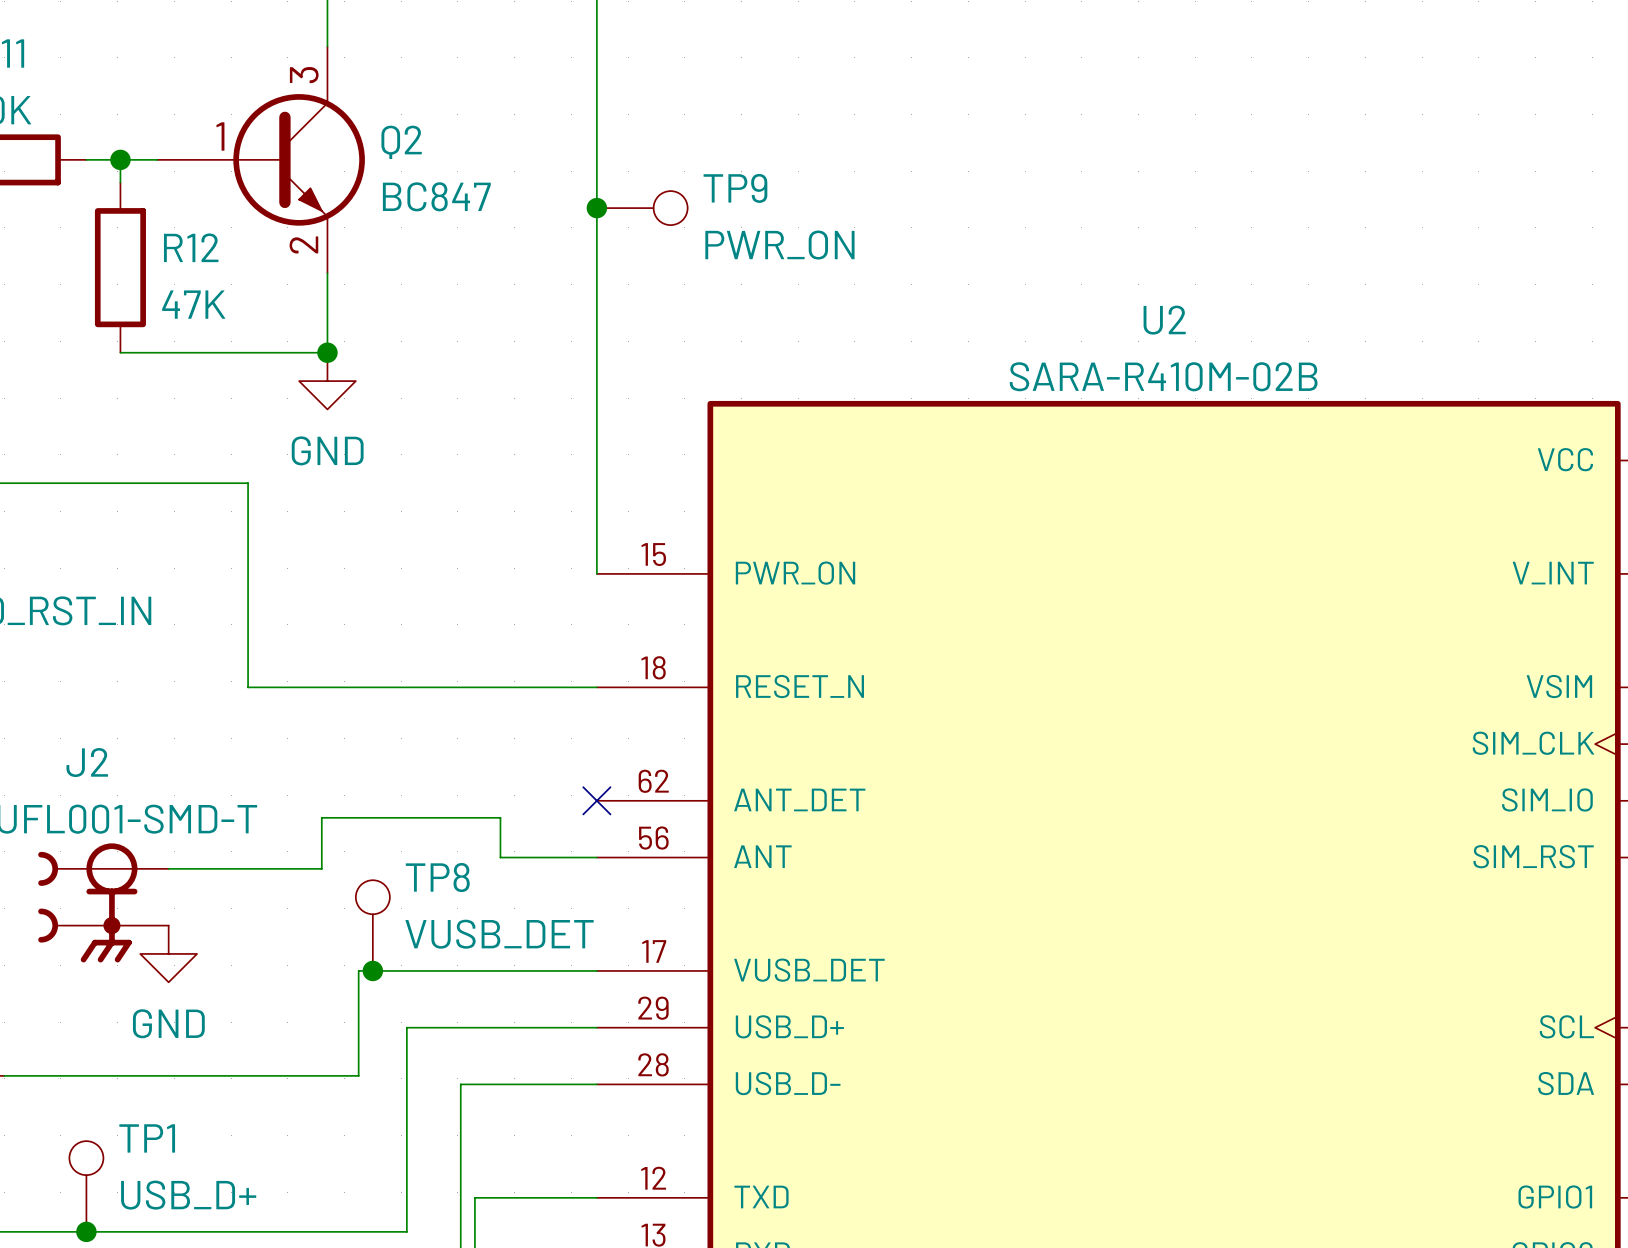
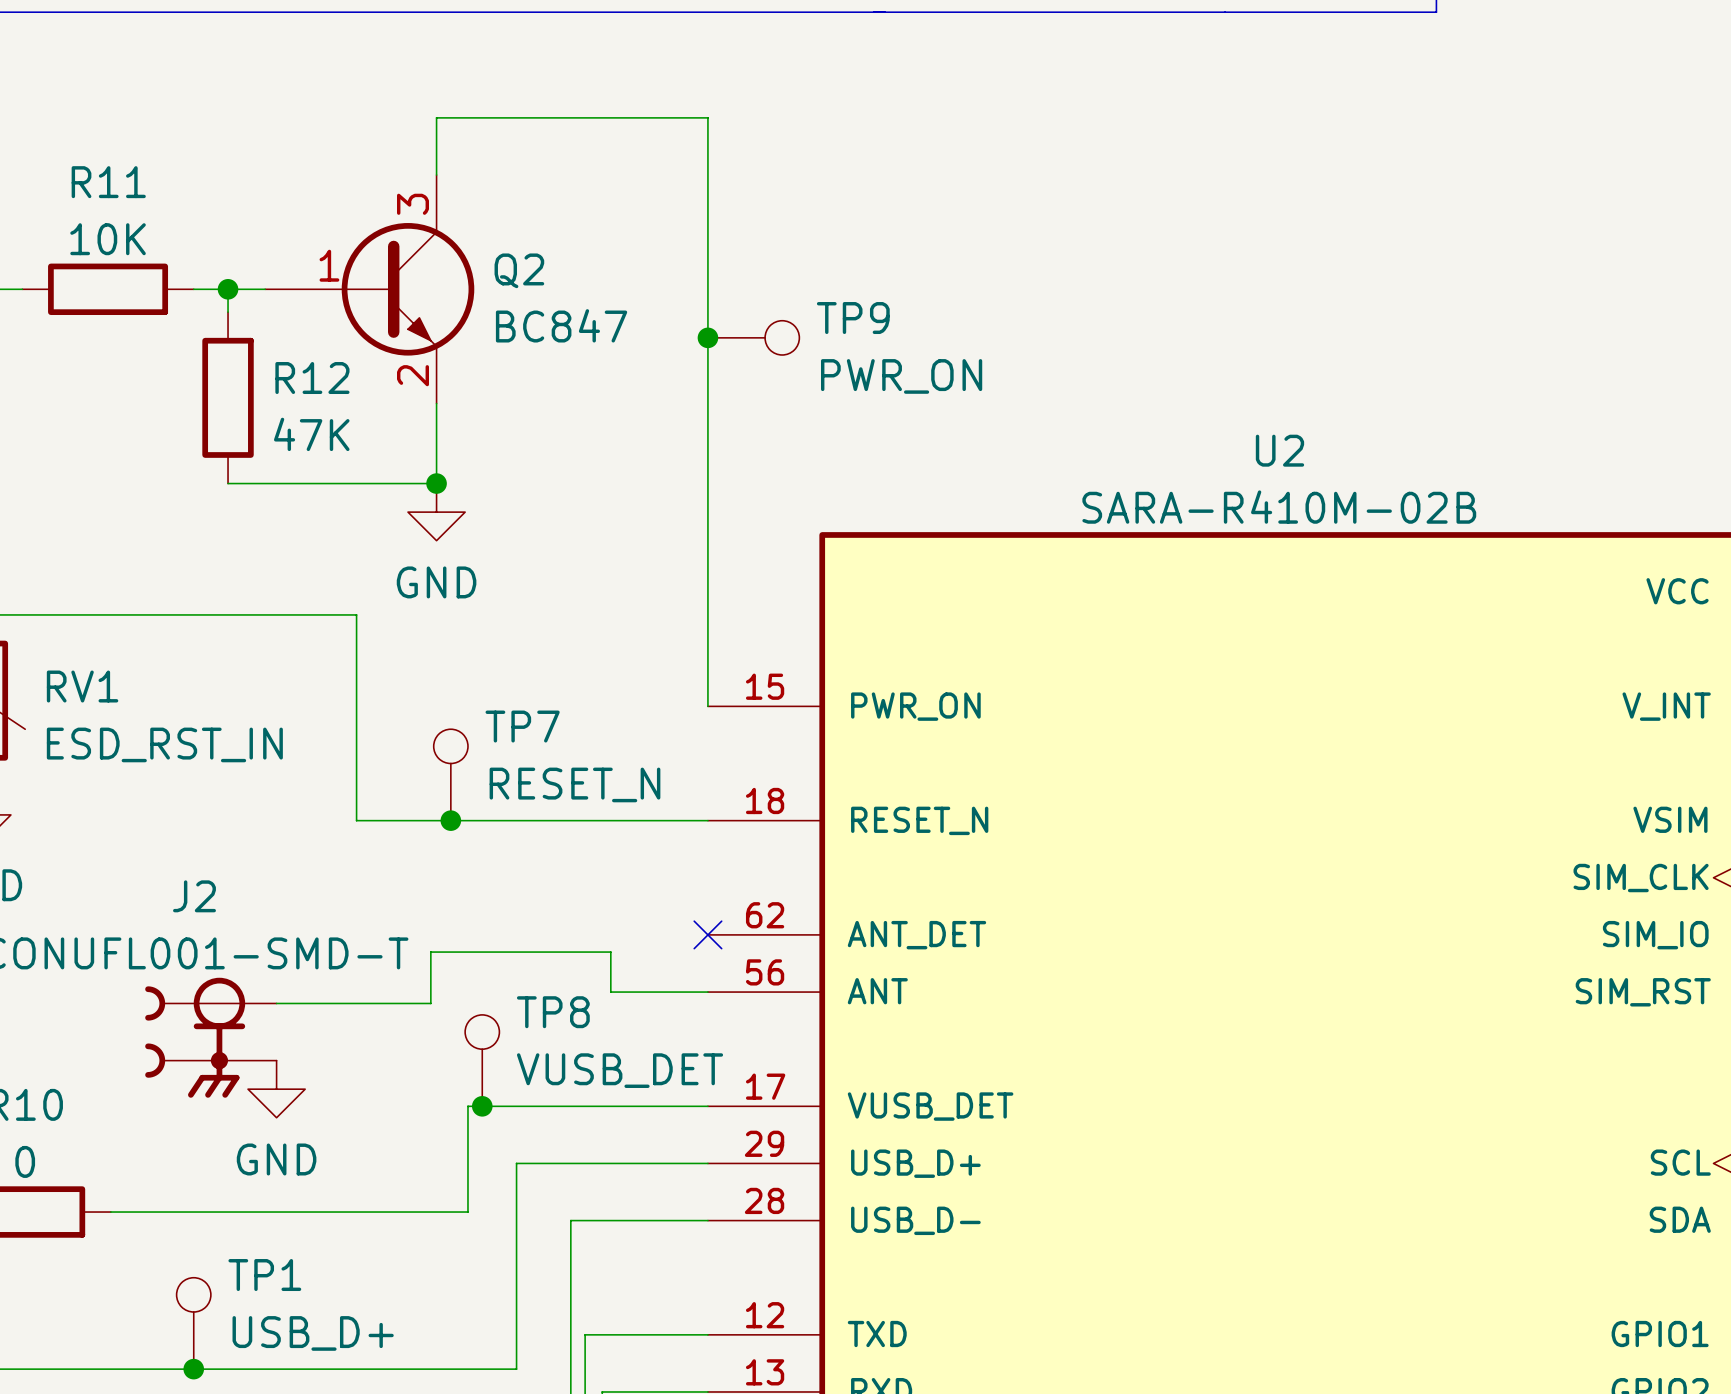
TP7: none -> RESET_N (450, 774)
junction: none -> (450, 820)

